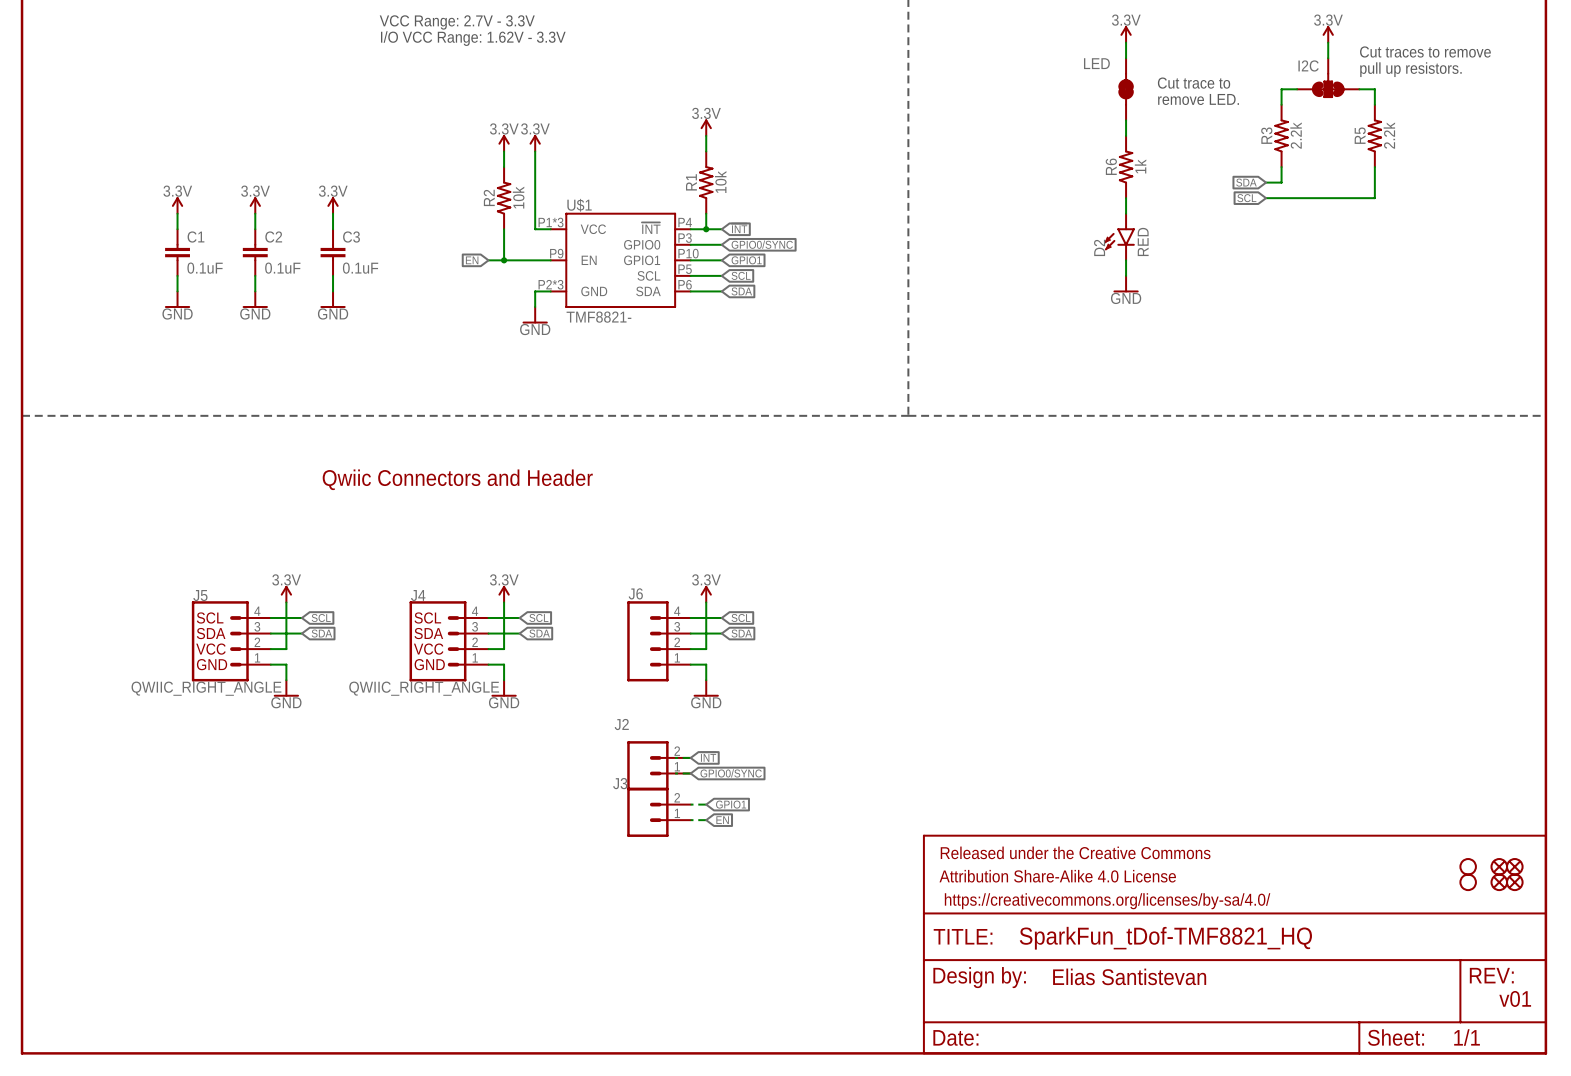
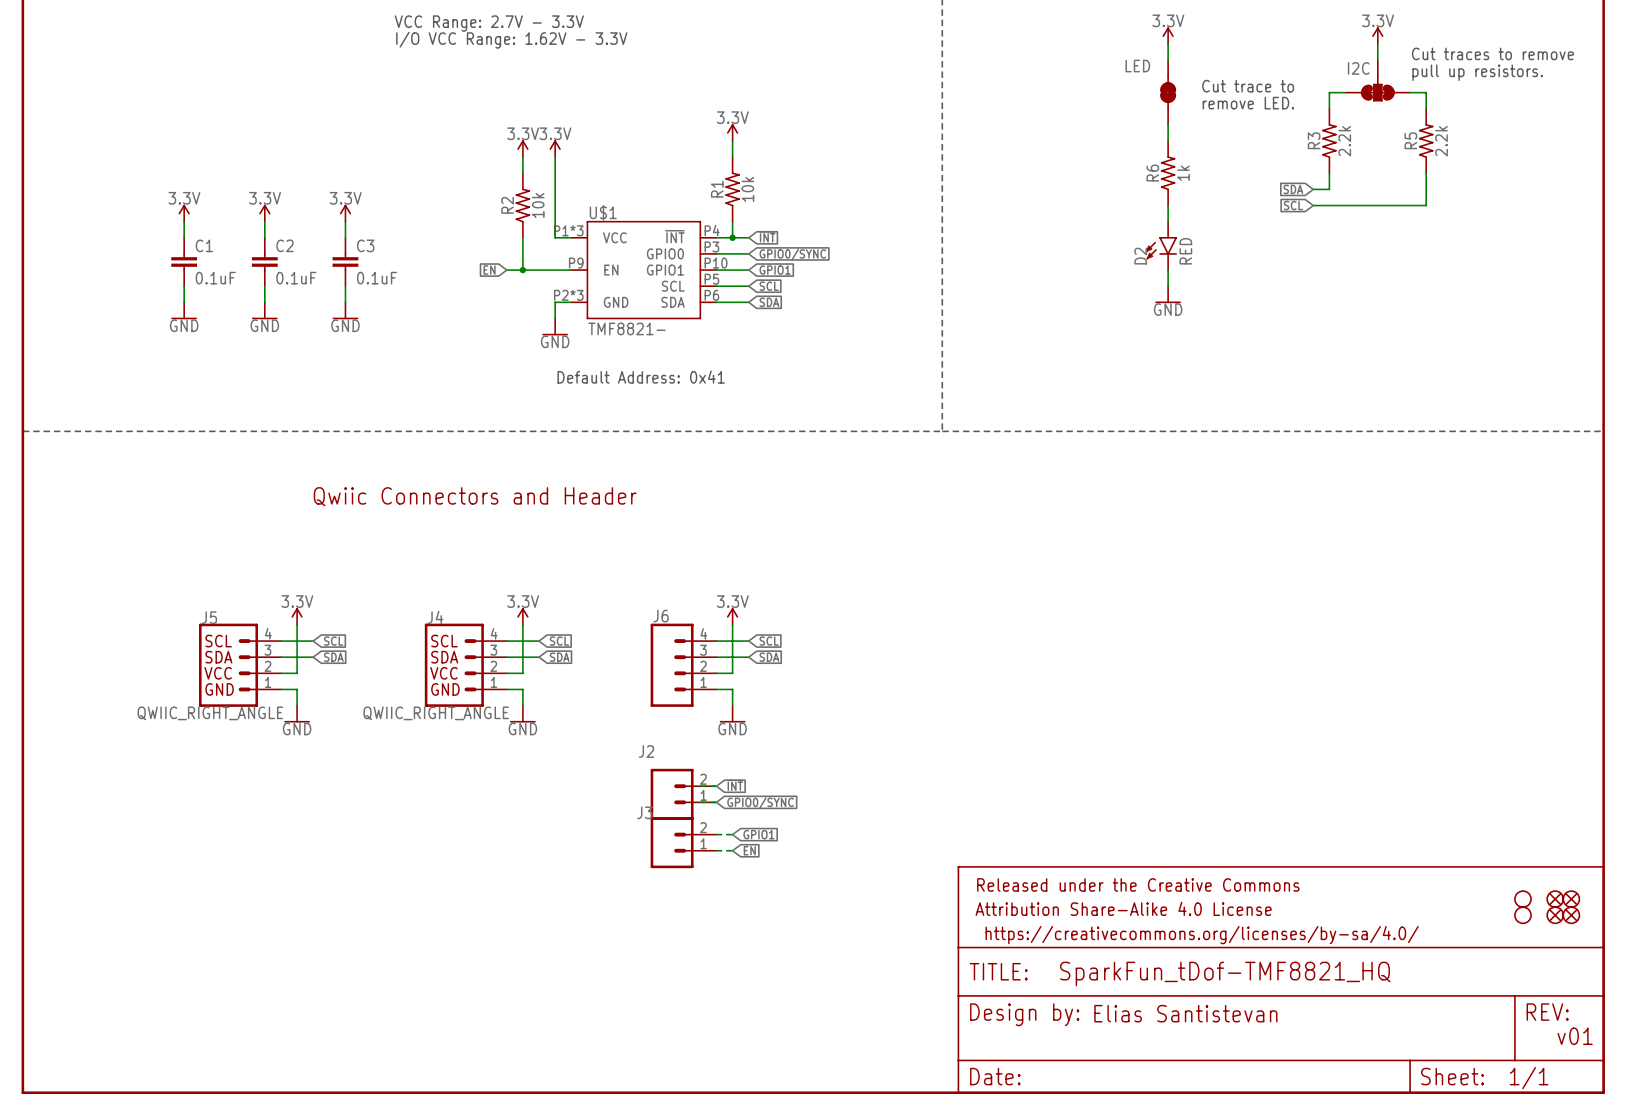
text: none -> Default Address: 0x41 (641, 377)

